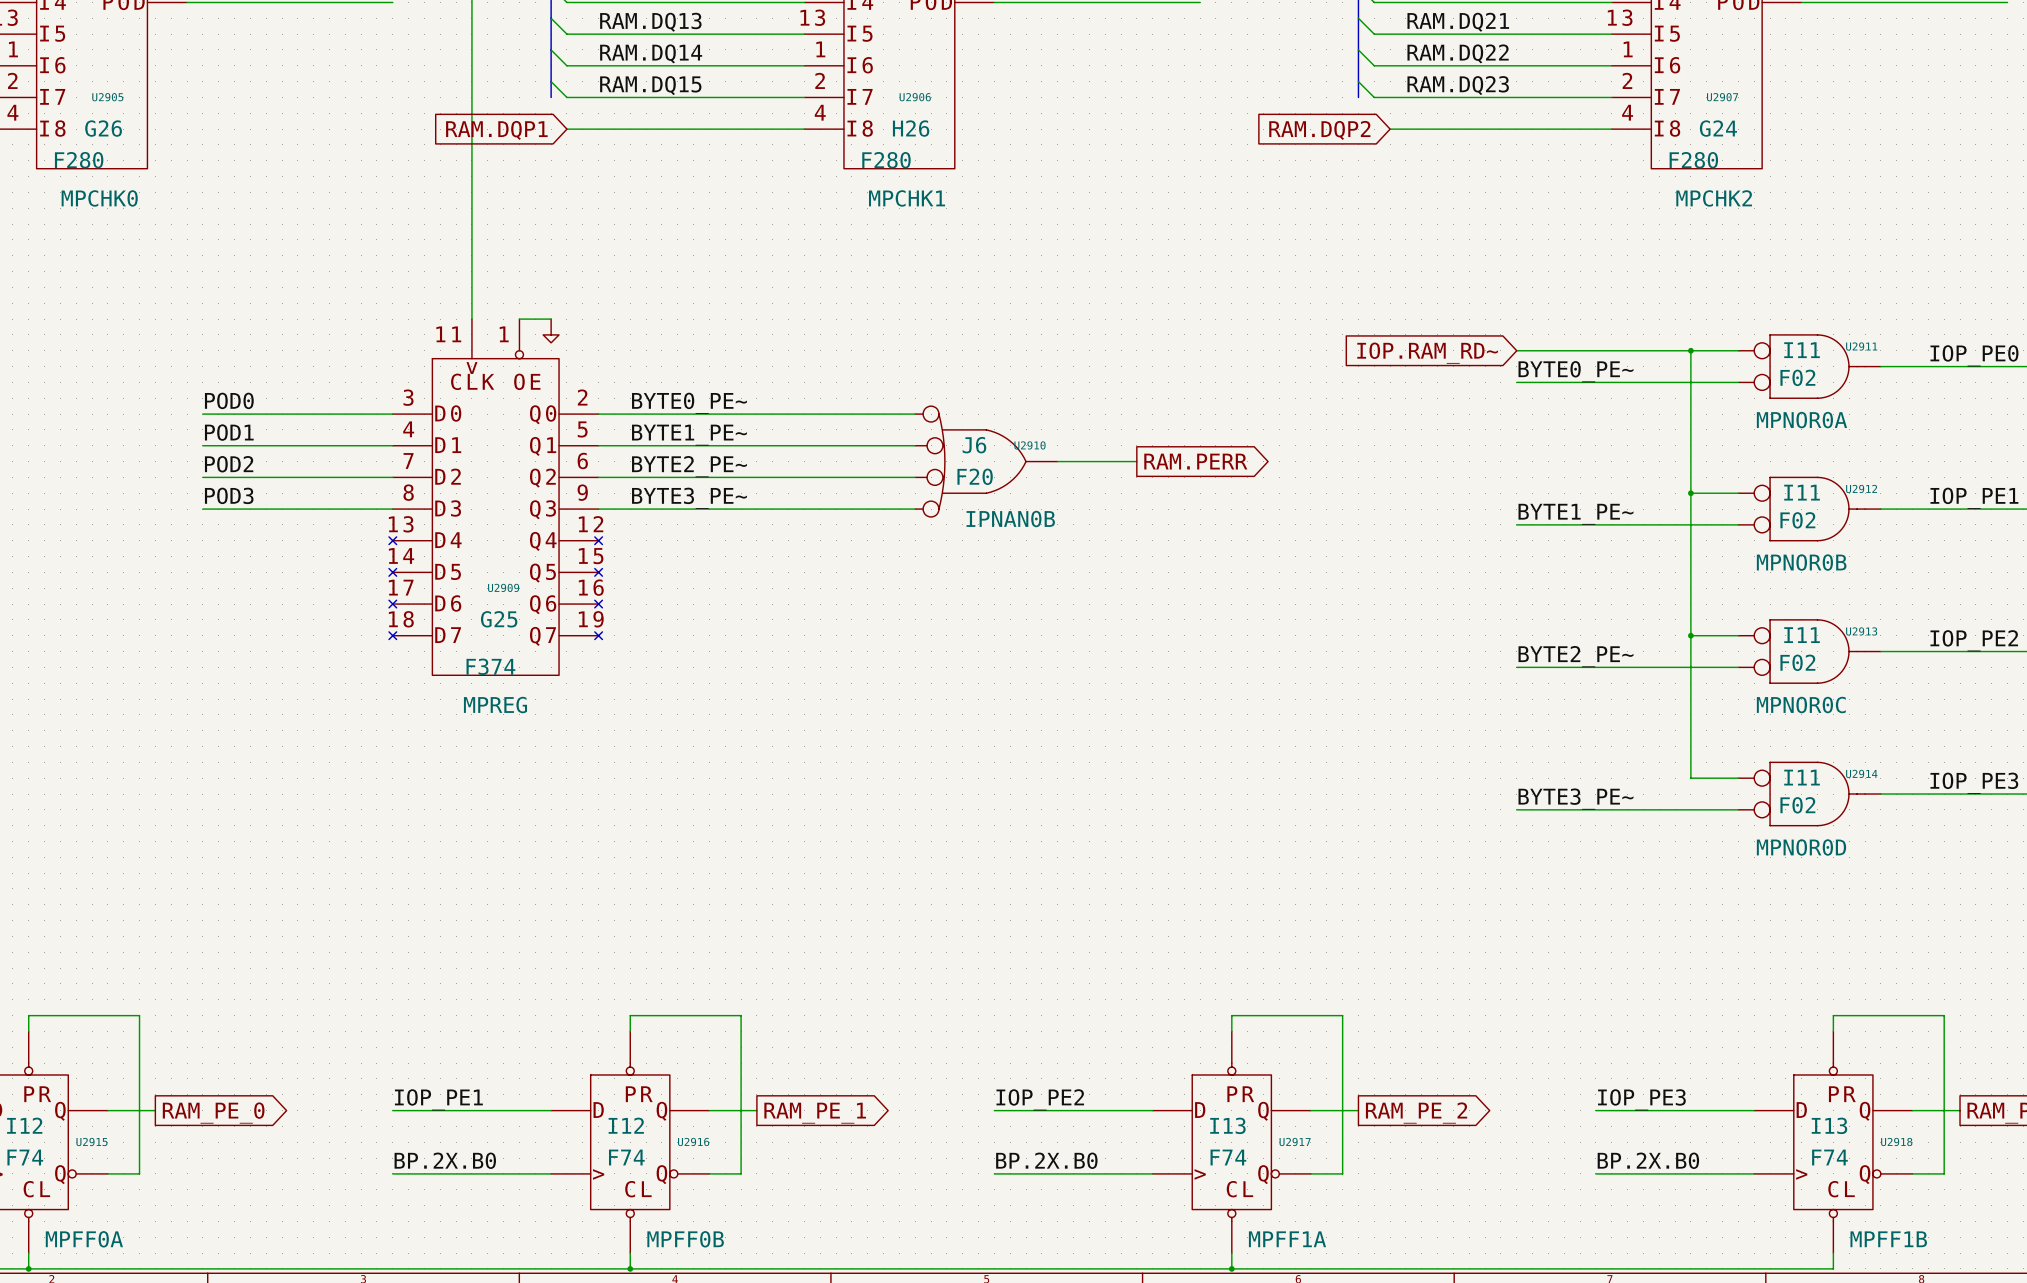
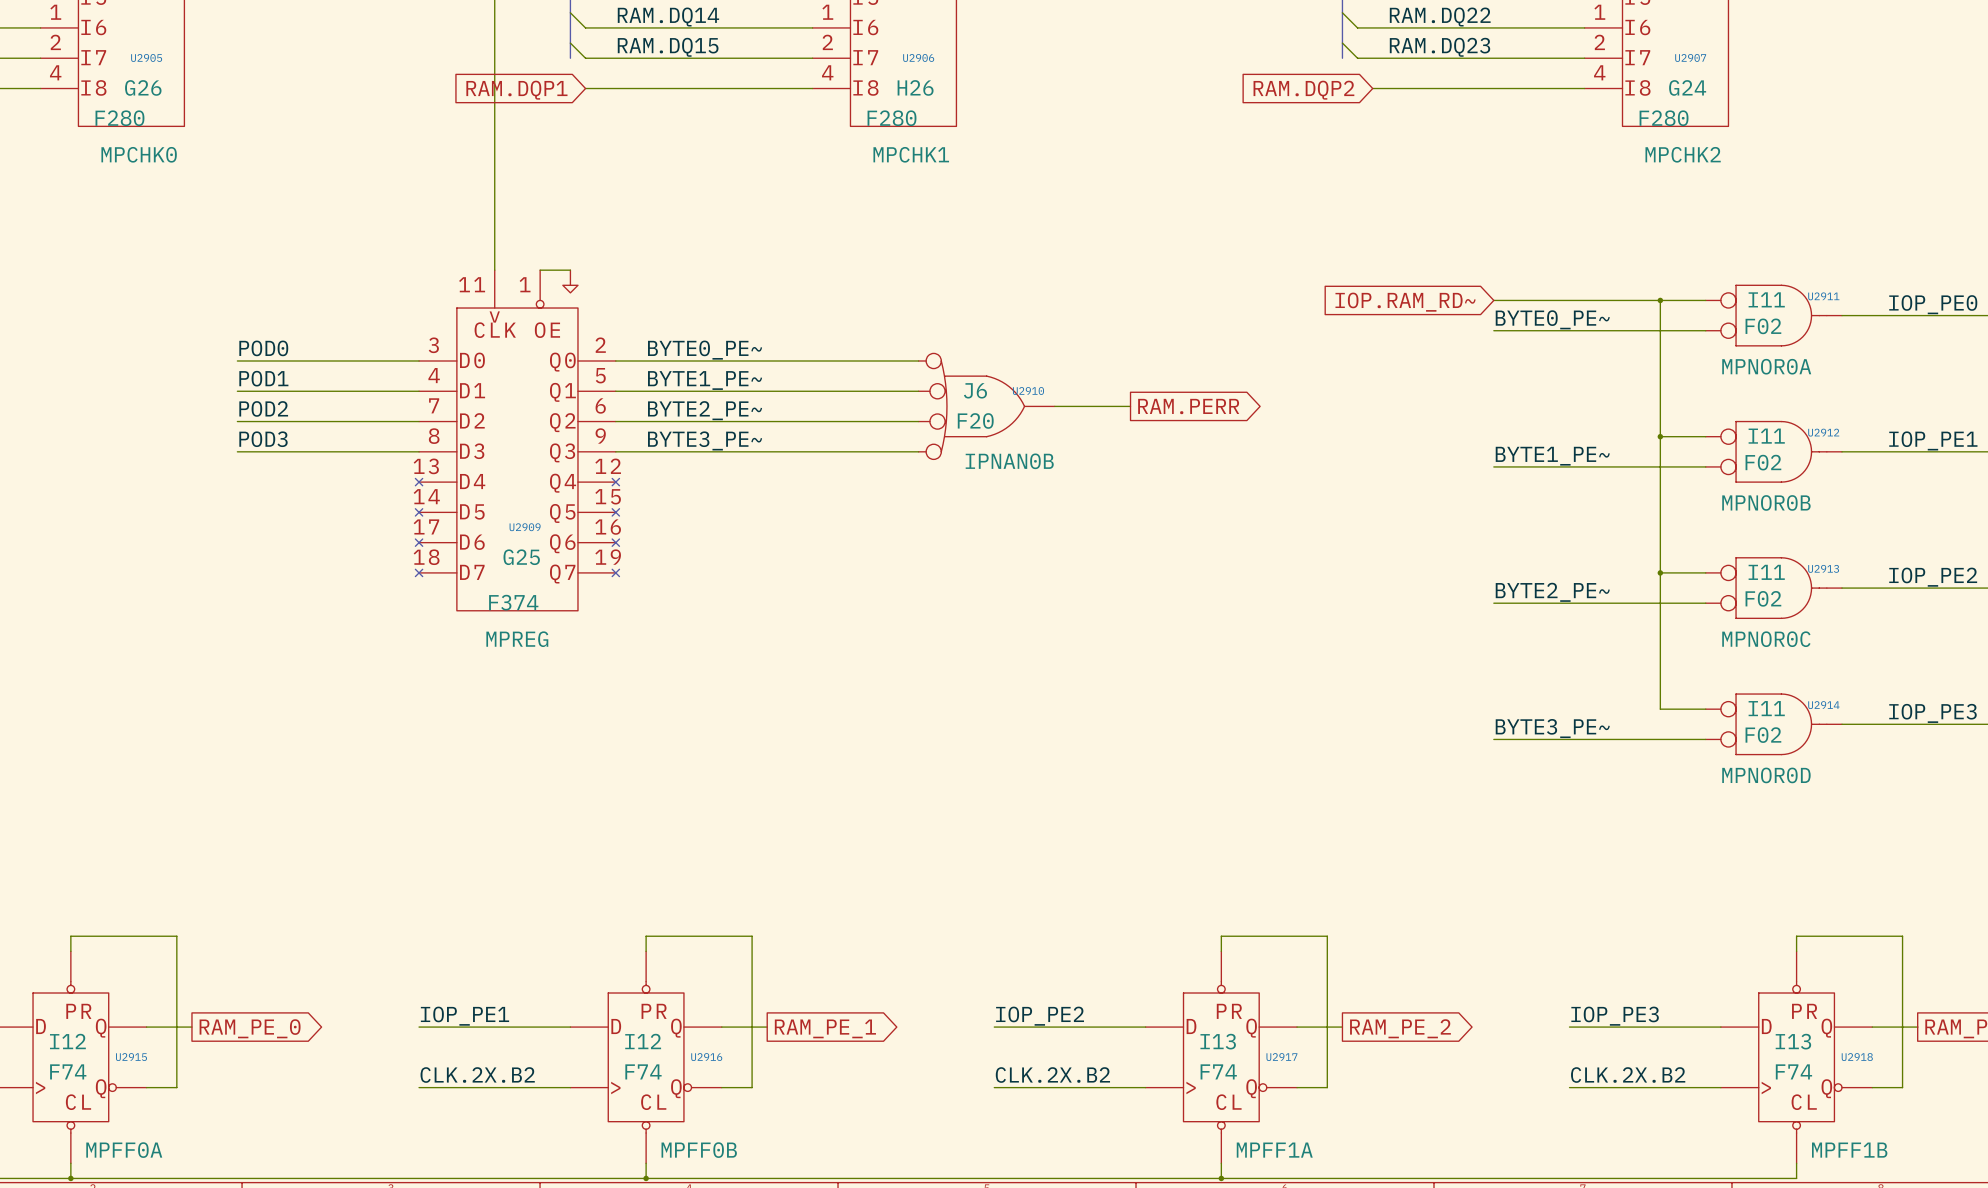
label: BP.2X.B0 (445, 1160) -> CLK.2X.B2 (477, 1075)
label: BP.2X.B0 (1046, 1160) -> CLK.2X.B2 (1052, 1075)
label: BP.2X.B0 (1648, 1160) -> CLK.2X.B2 (1628, 1075)

